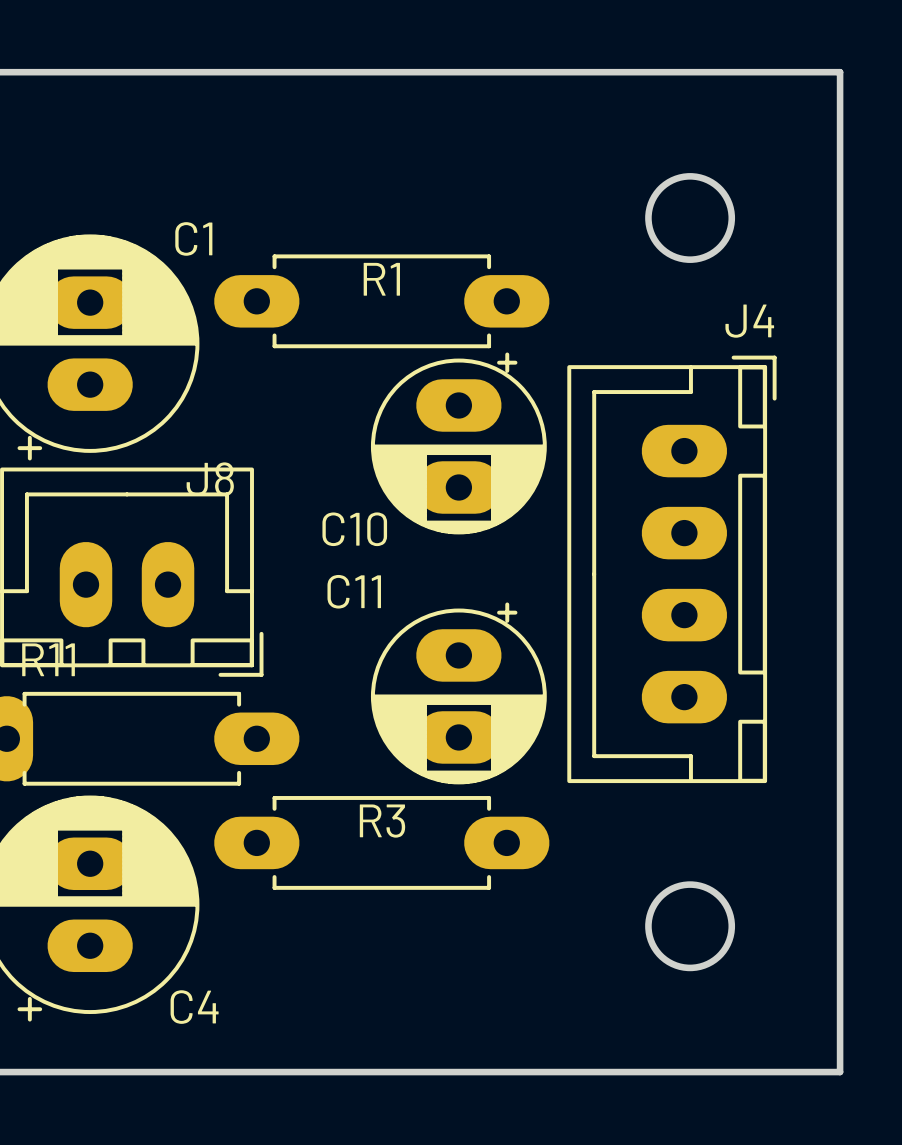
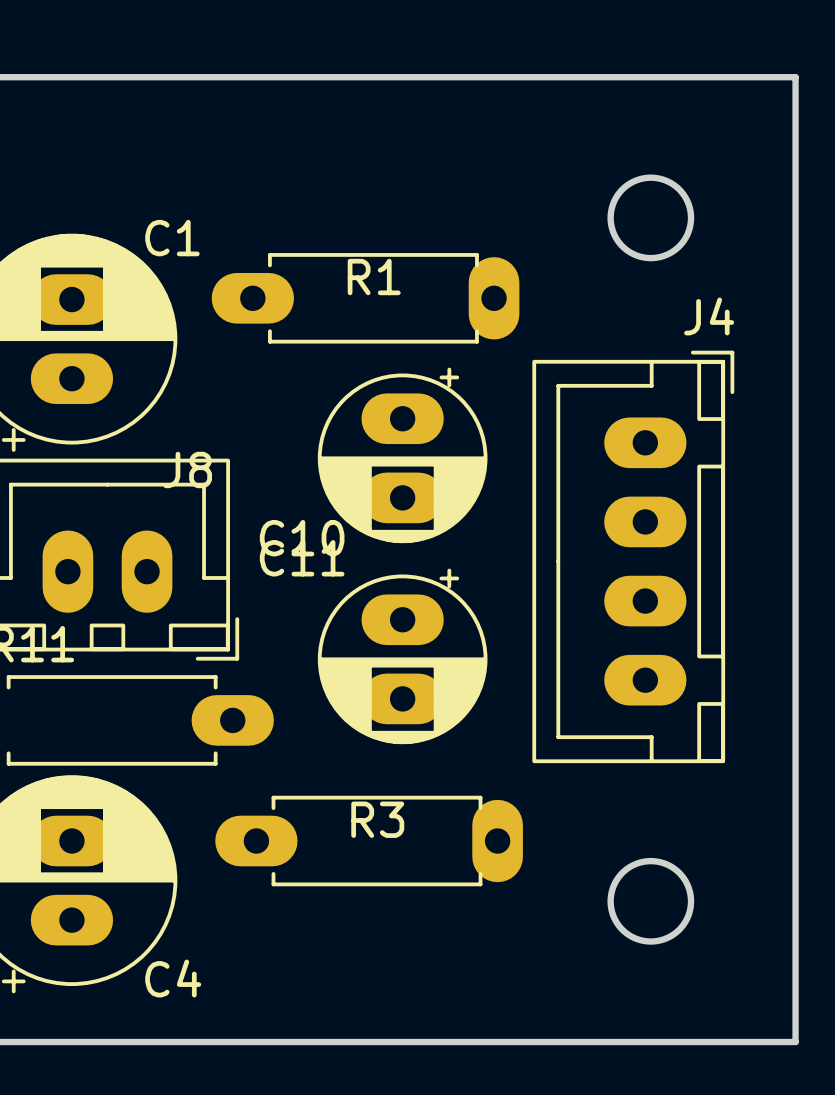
R1 footprint: [214, 254, 550, 349] -> [211, 253, 520, 344]
C10 position: (458, 443) -> (402, 455)
C11 position: (458, 693) -> (402, 656)
R3 footprint: [214, 796, 550, 890] -> [215, 795, 523, 887]

